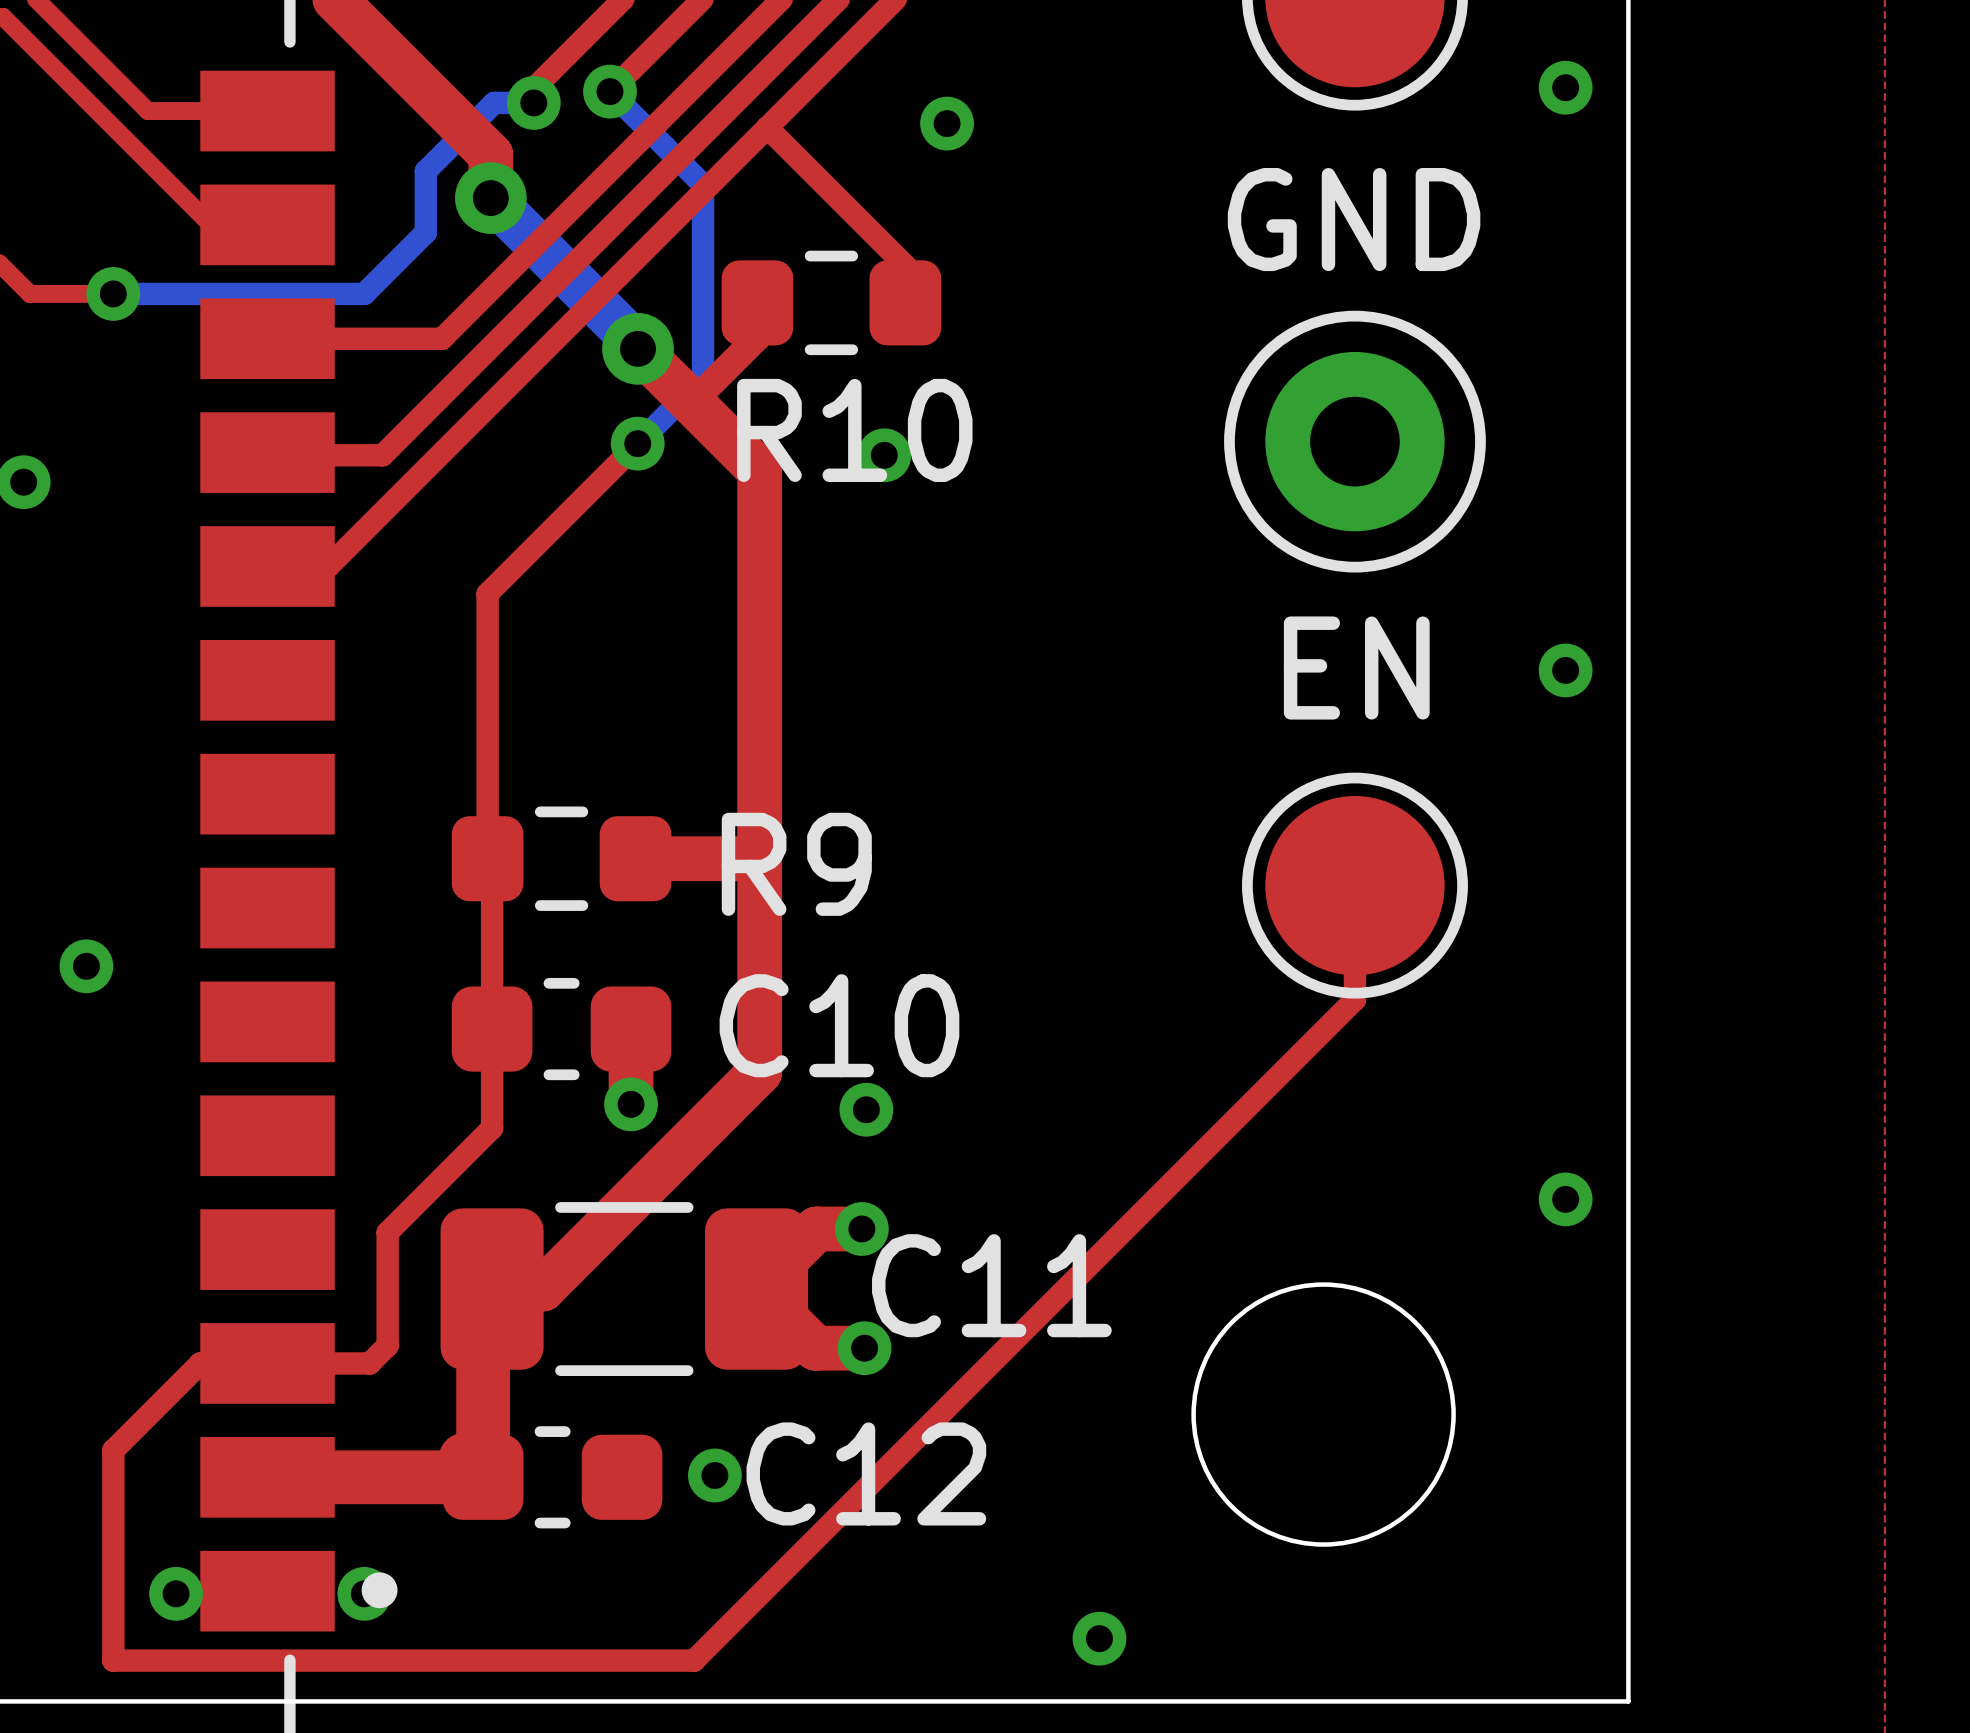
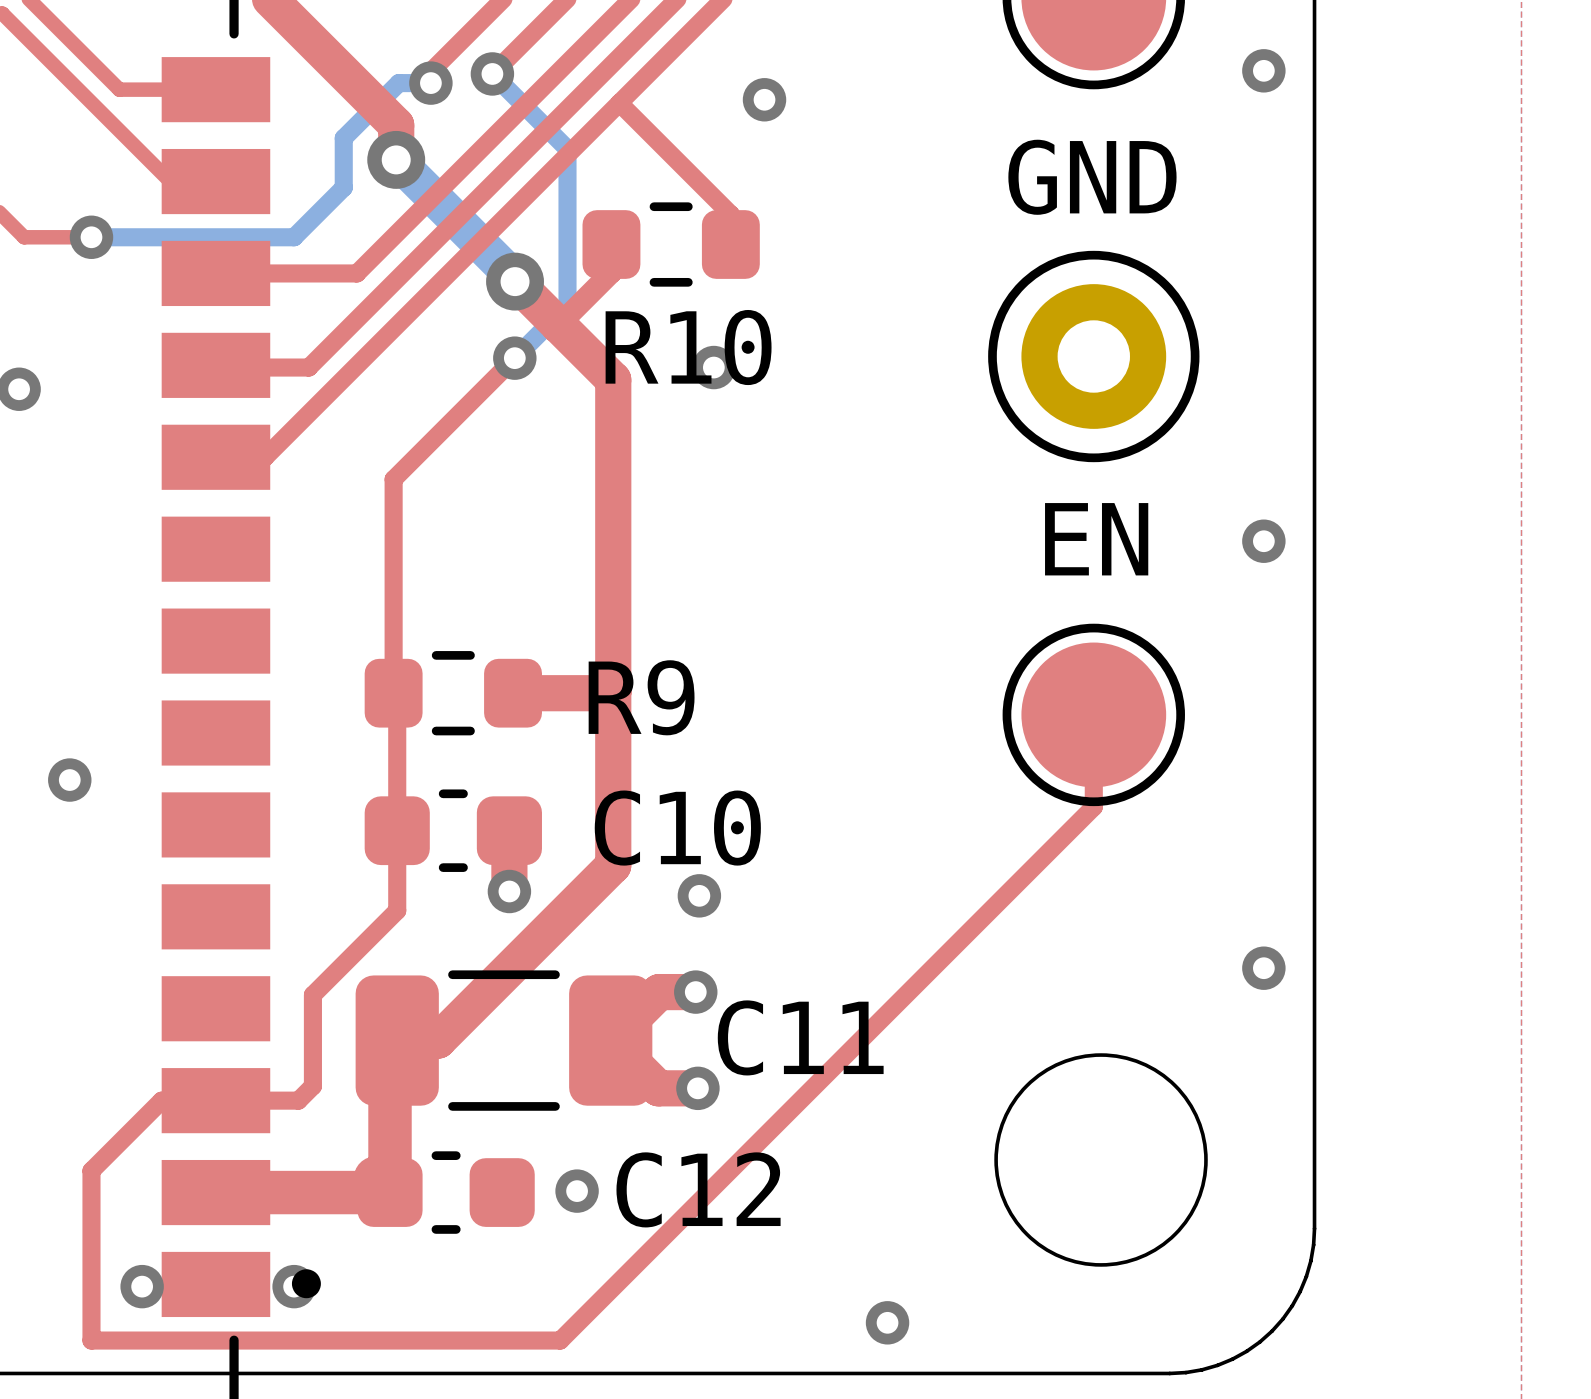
round board edge position: (1323, 1414) -> (1101, 1159)
board edge: (1628, 1522) (1628, 1701) (1449, 1701) -> (1314, 1228) (1313, 1244) (1306, 1276) (1292, 1305) (1272, 1331) (1246, 1351) (1217, 1365) (1185, 1372) (1169, 1373)

